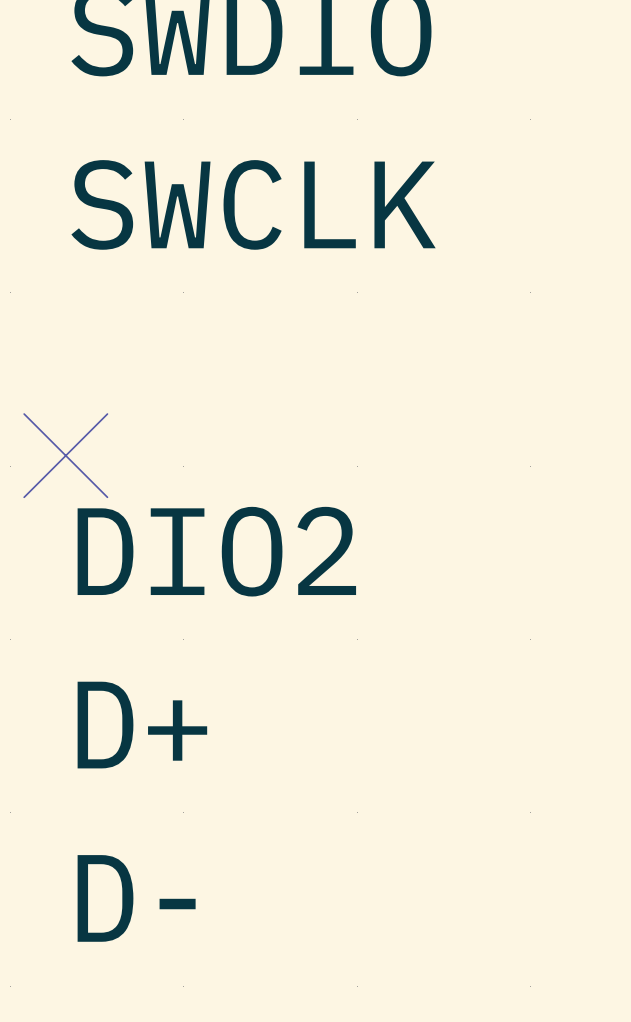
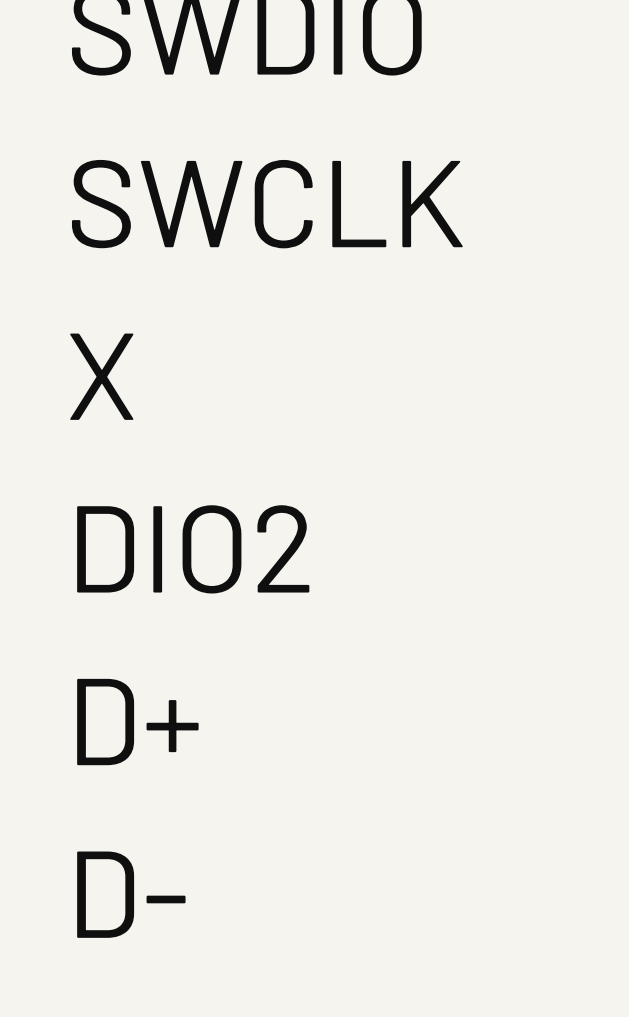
label: none -> X (101, 376)
no-connect mark: (65, 455) -> none

